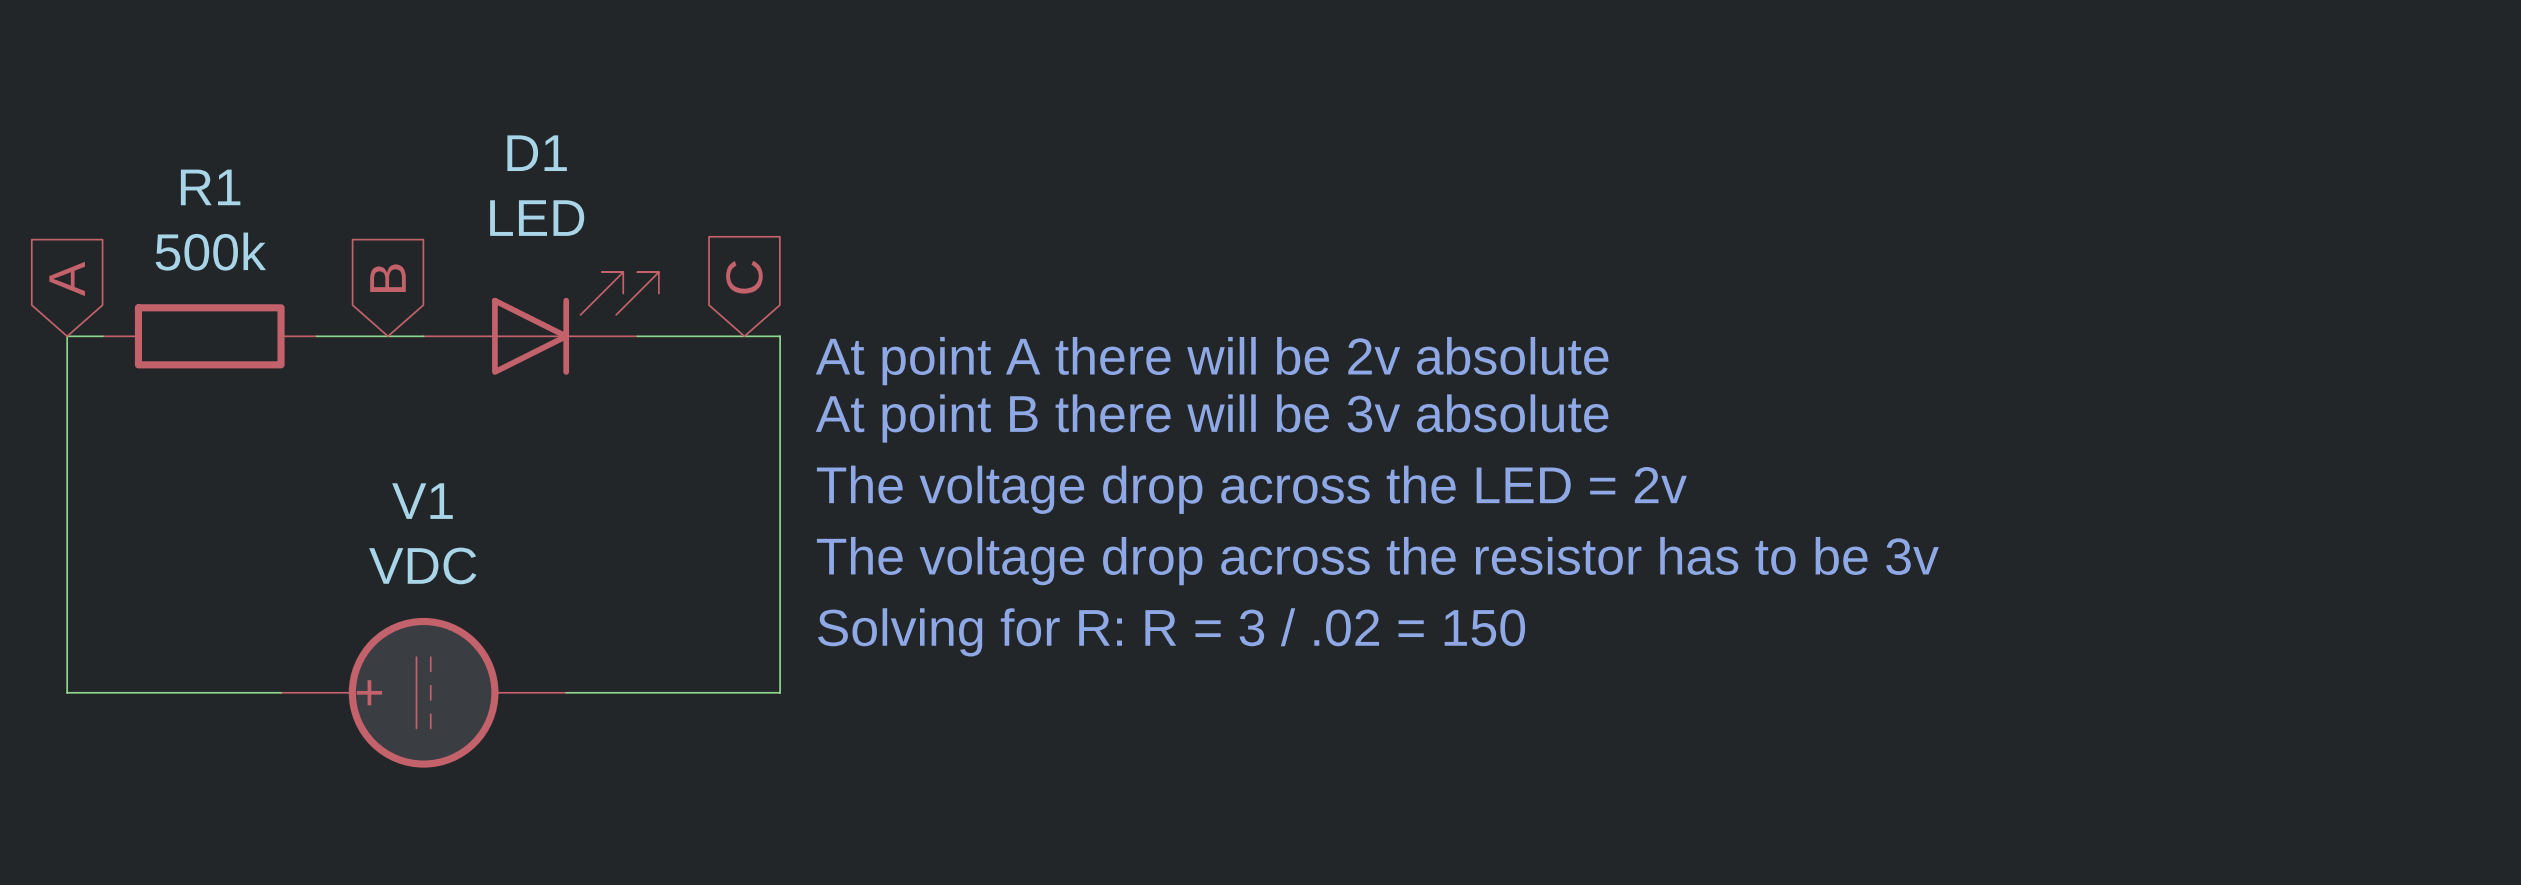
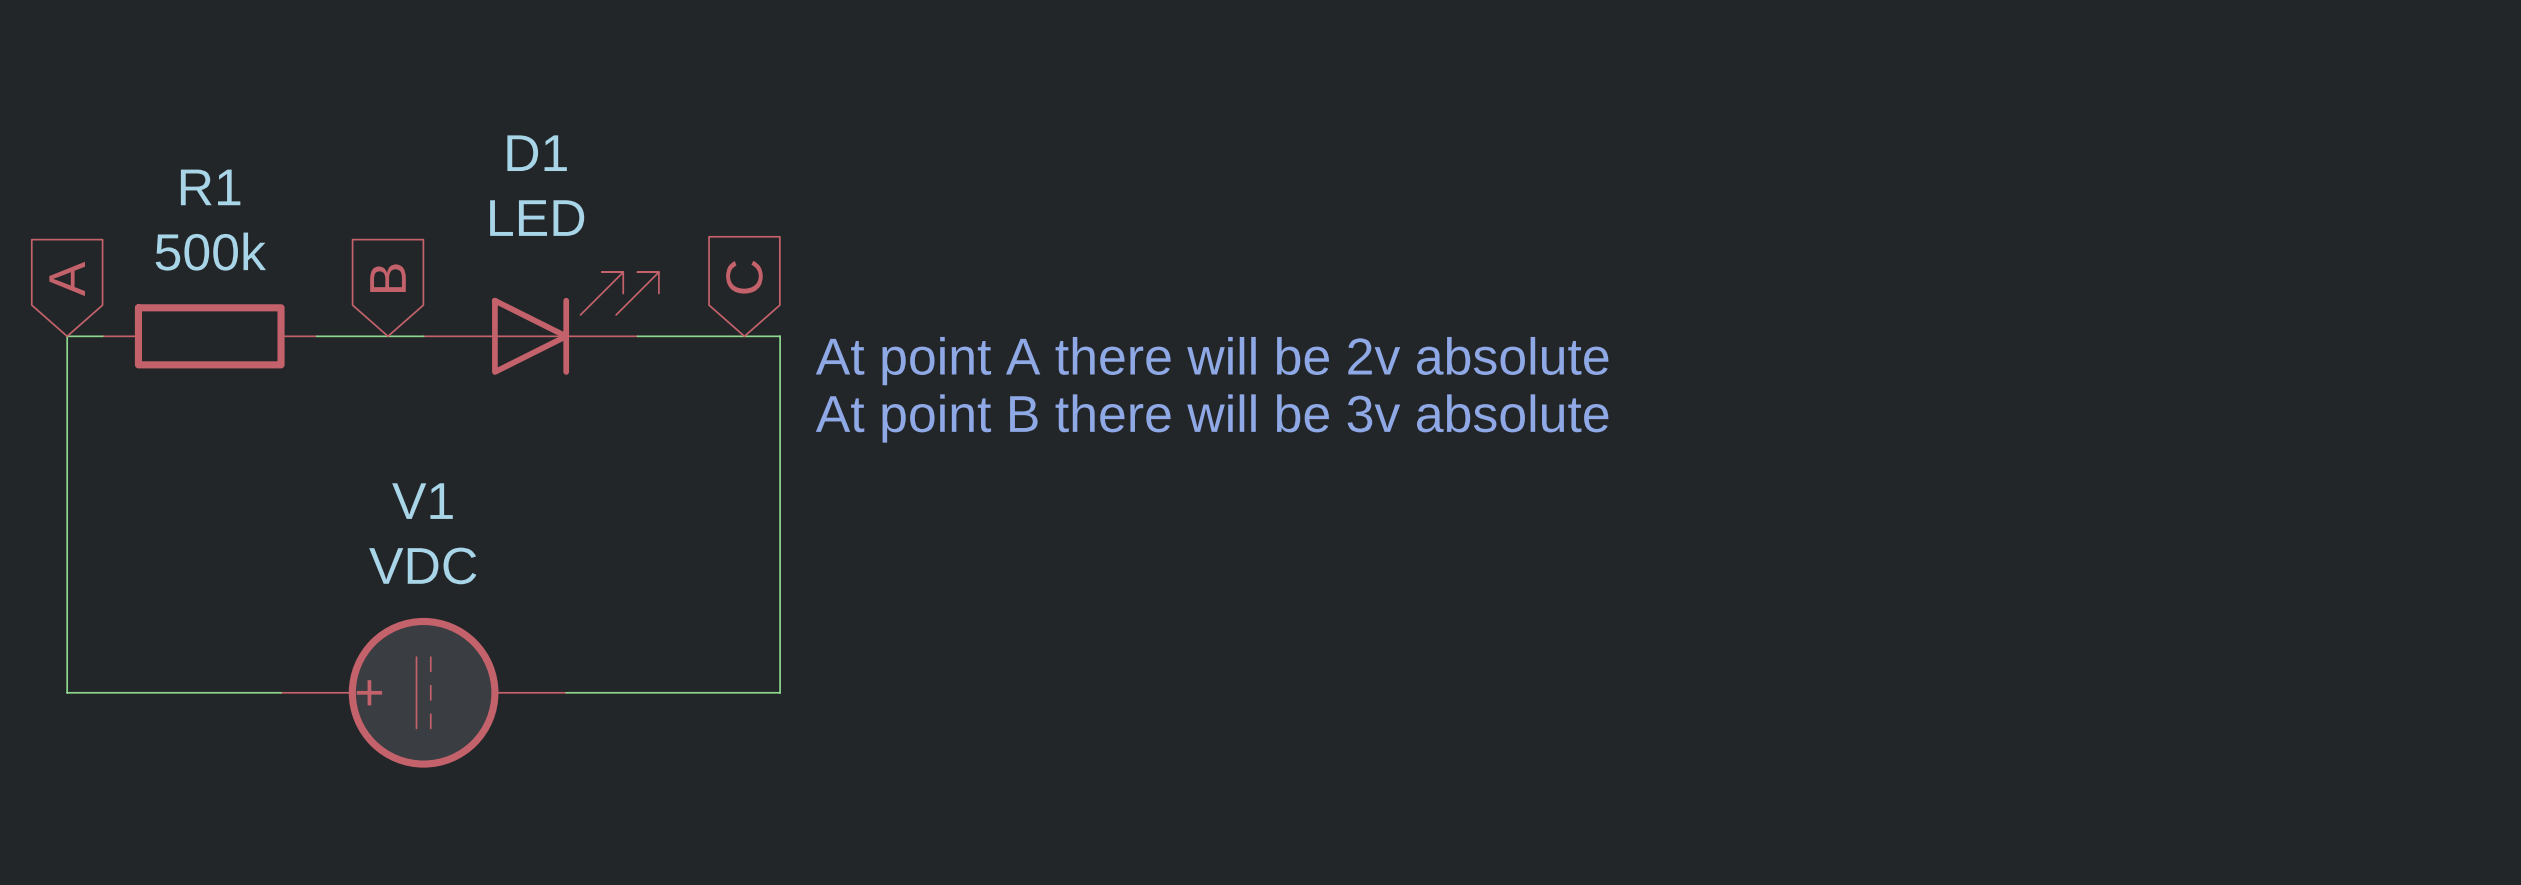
text: The voltage drop across the LED = 2v (1251, 489) -> none
text: The voltage drop across the resistor has to be 3v (1377, 561) -> none
text: Solving for R: R = 3 / .02 = 150 (1171, 632) -> none

